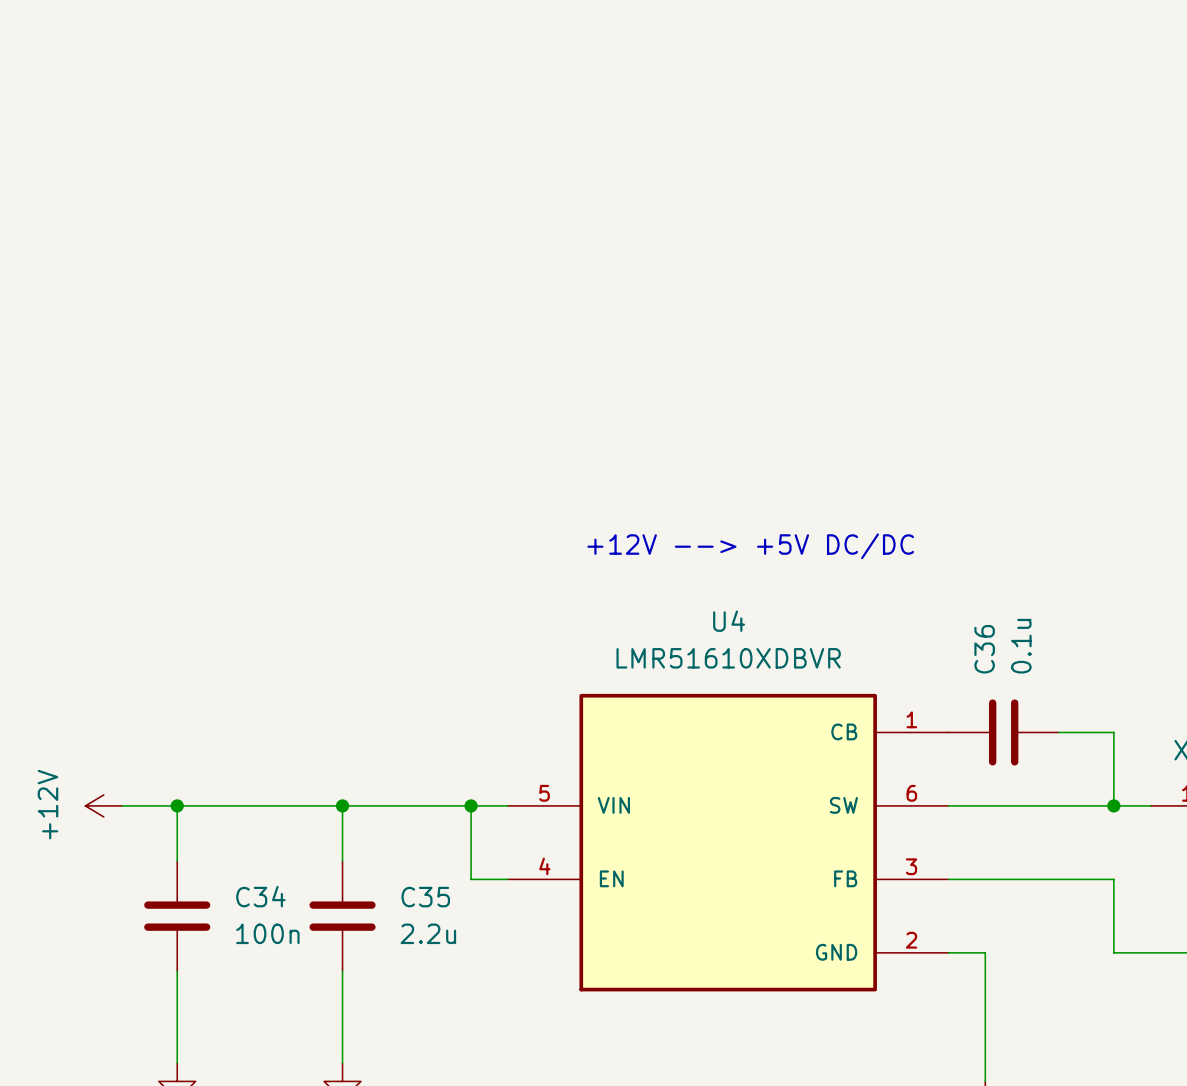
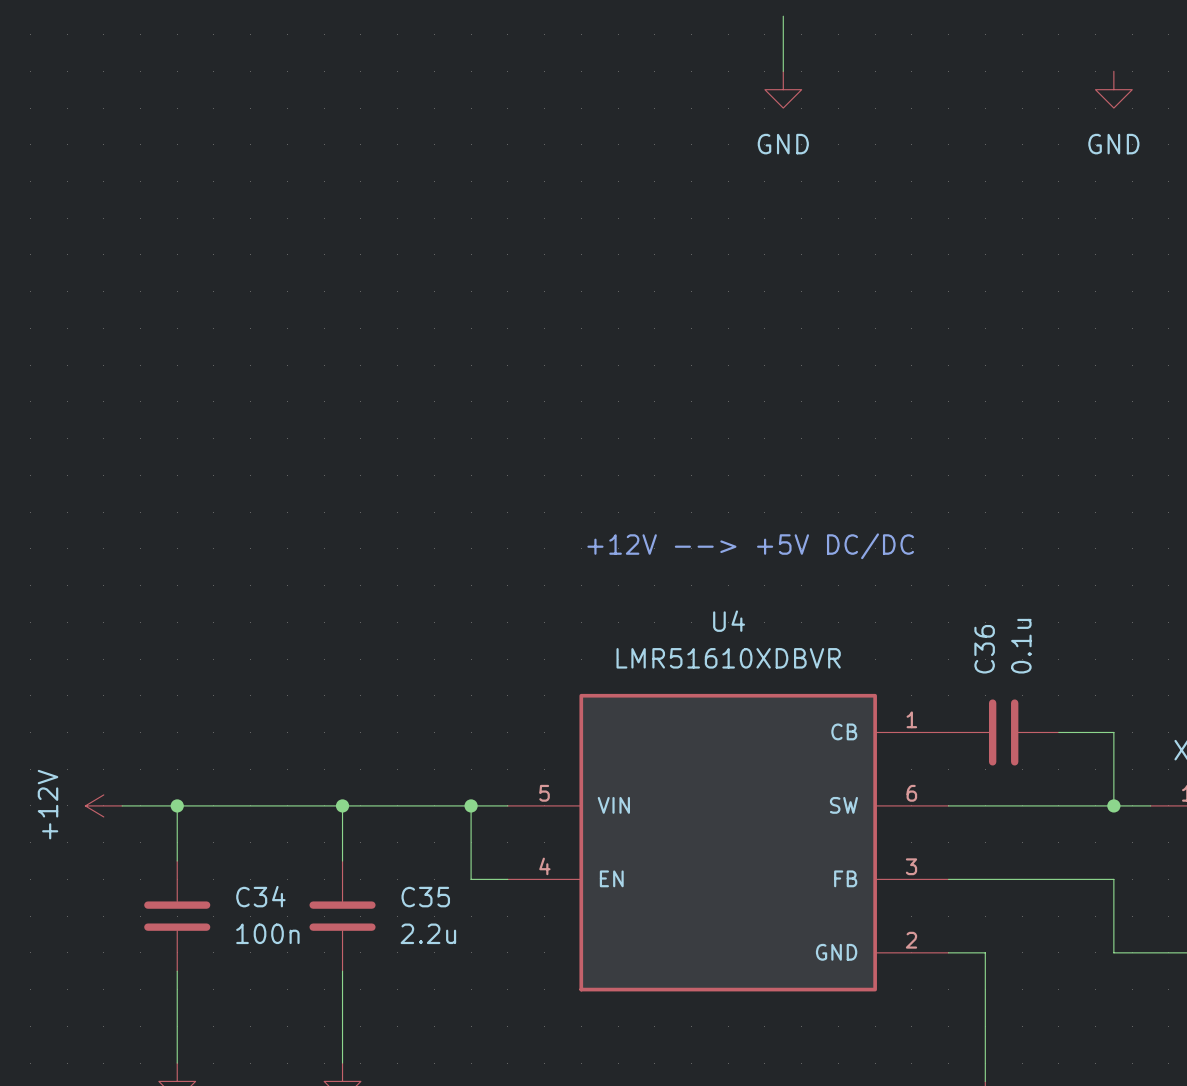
wire: none -> (783, 16) (783, 71)
power symbol: none -> GND (783, 89)
power symbol: none -> GND (1113, 89)

